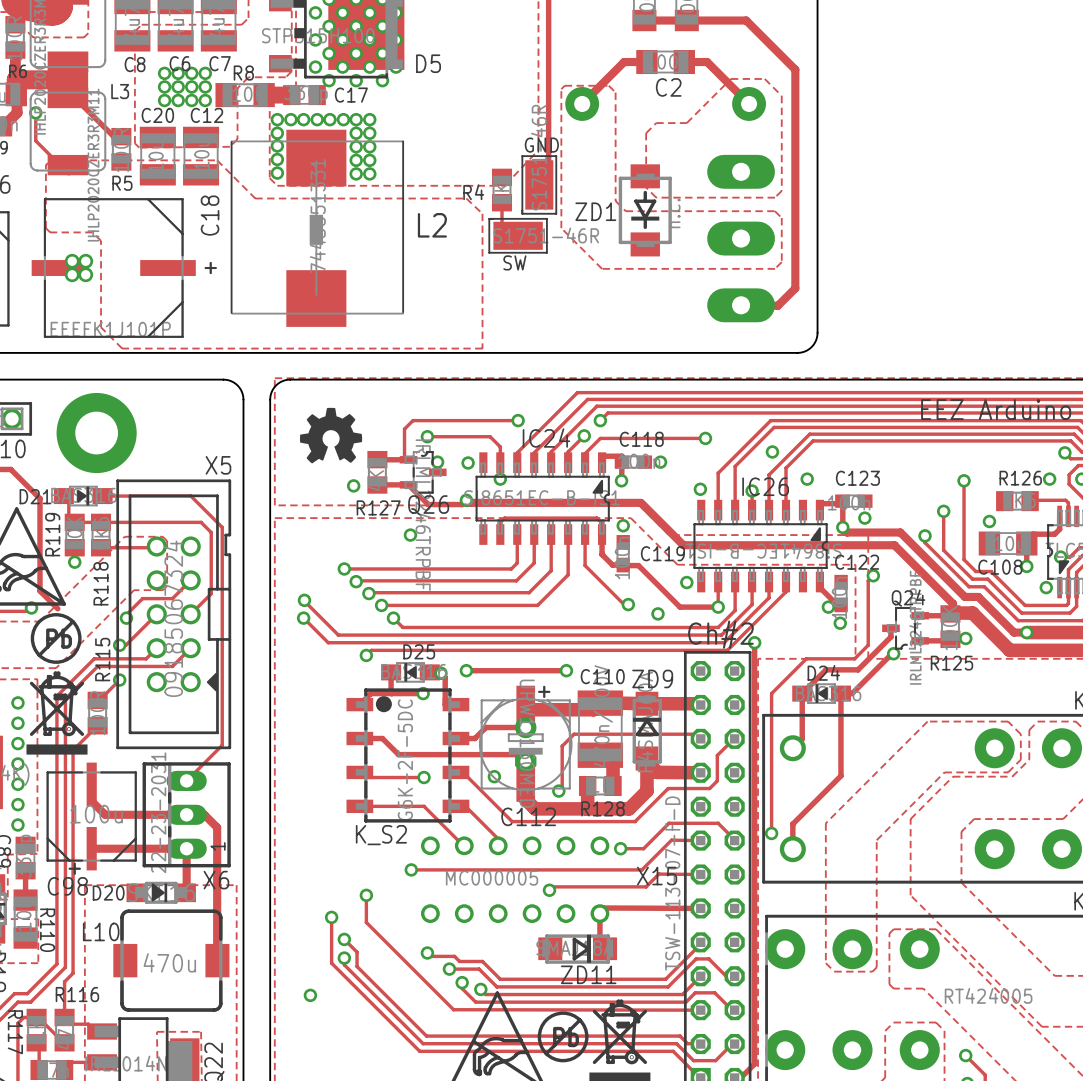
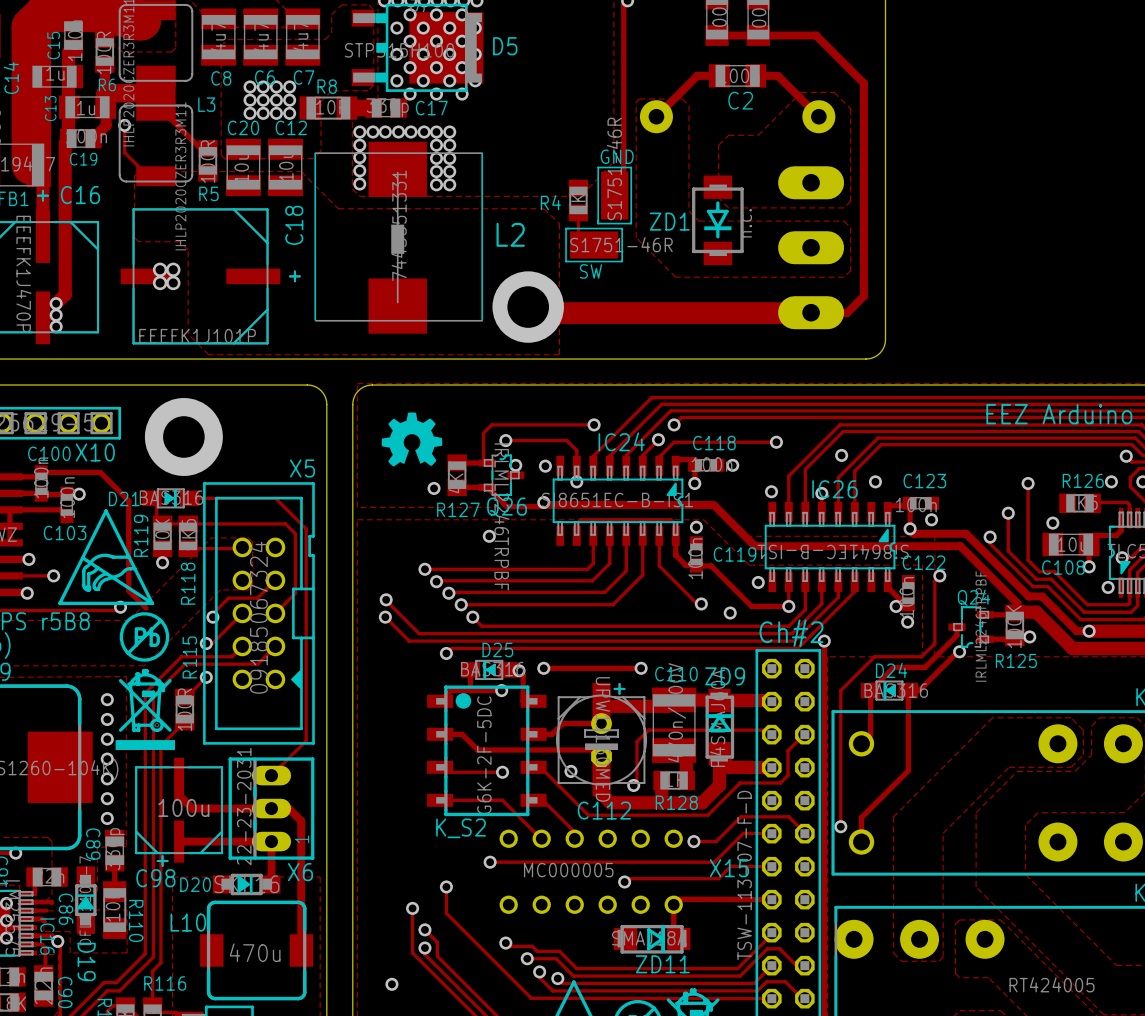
D5 name position: D5 (428, 63) -> D5 (505, 46)
track: none -> (528, 307) (534, 313) (811, 313)
via: none -> (528, 307)

